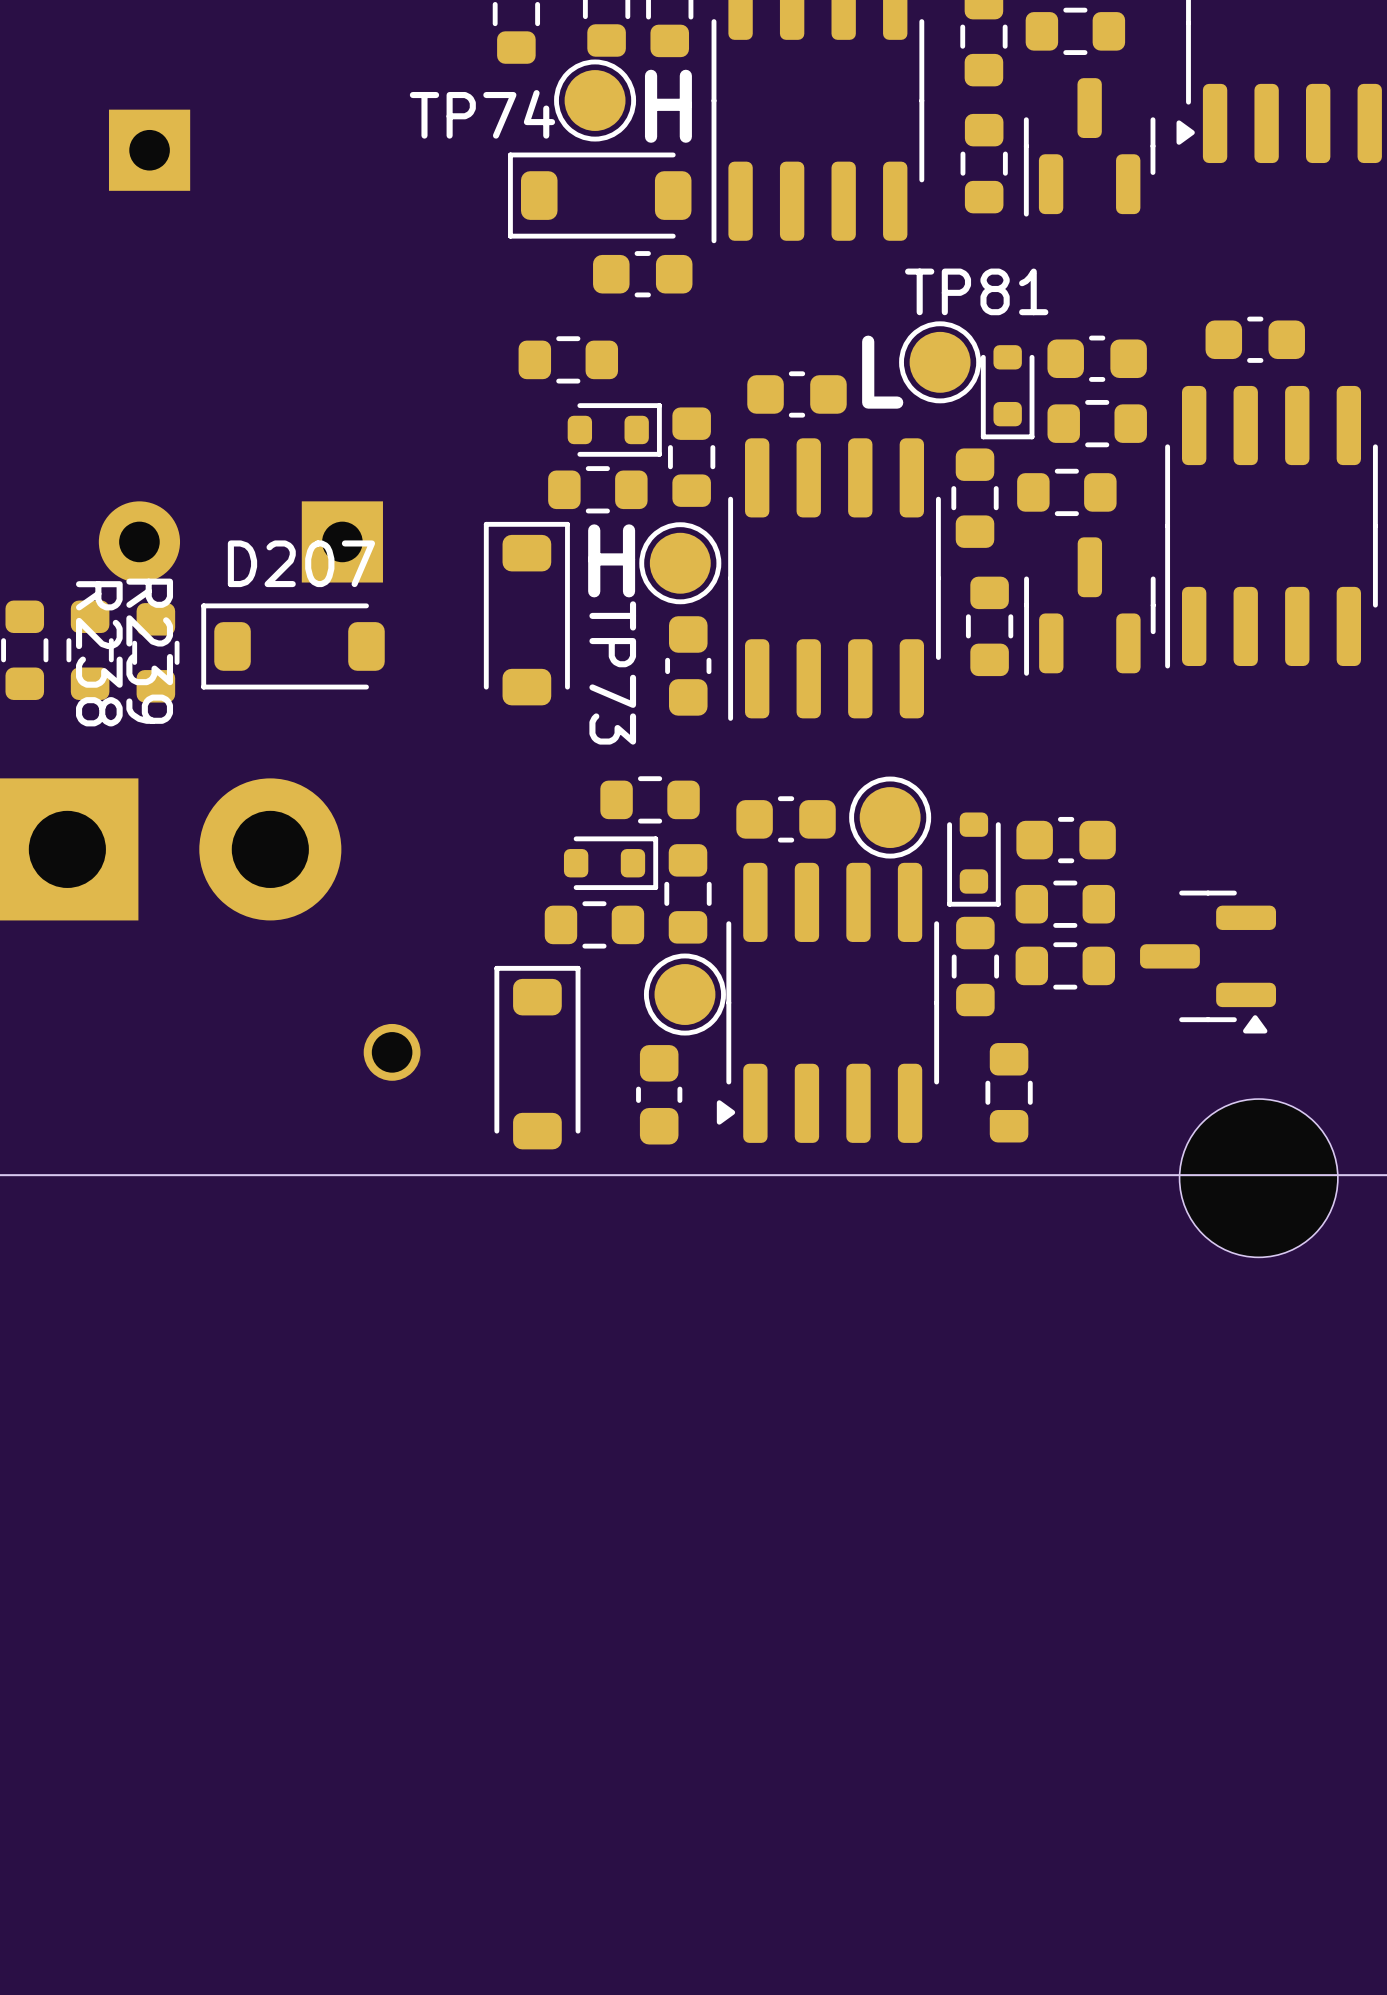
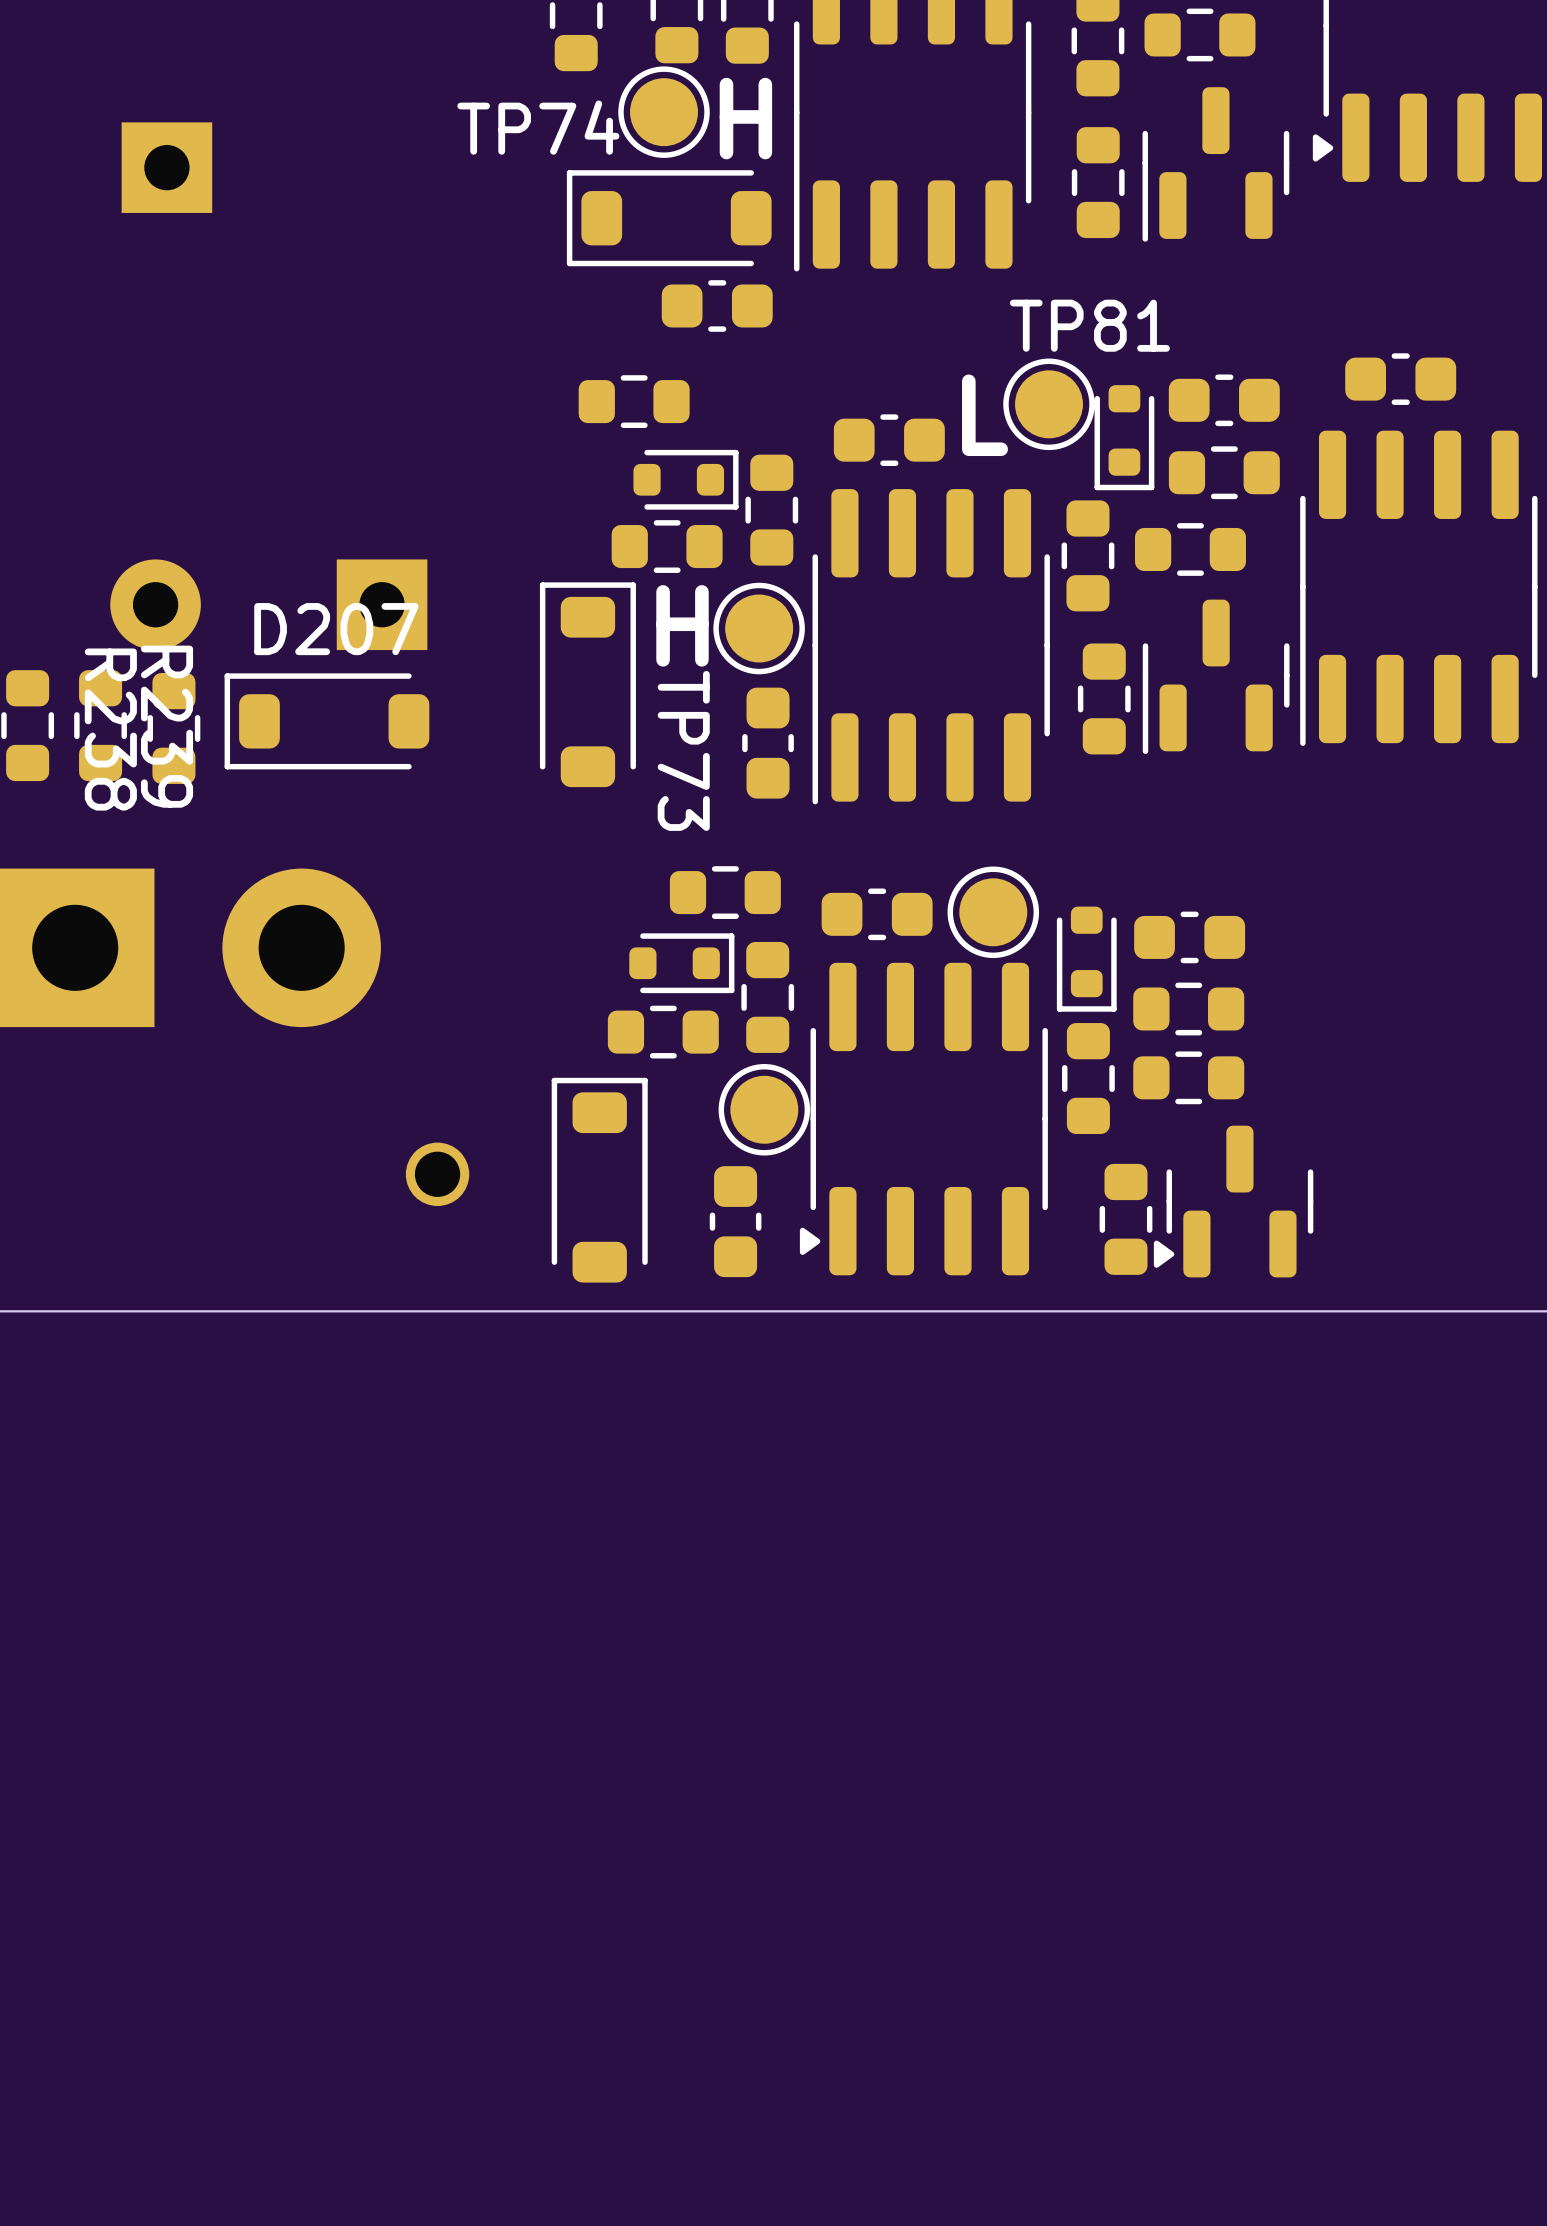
part rotation: 0° (1208, 962) -> 90° clockwise (1233, 1201)
part position: (1208, 962) -> (1233, 1201)
part: (1258, 1178) -> none

